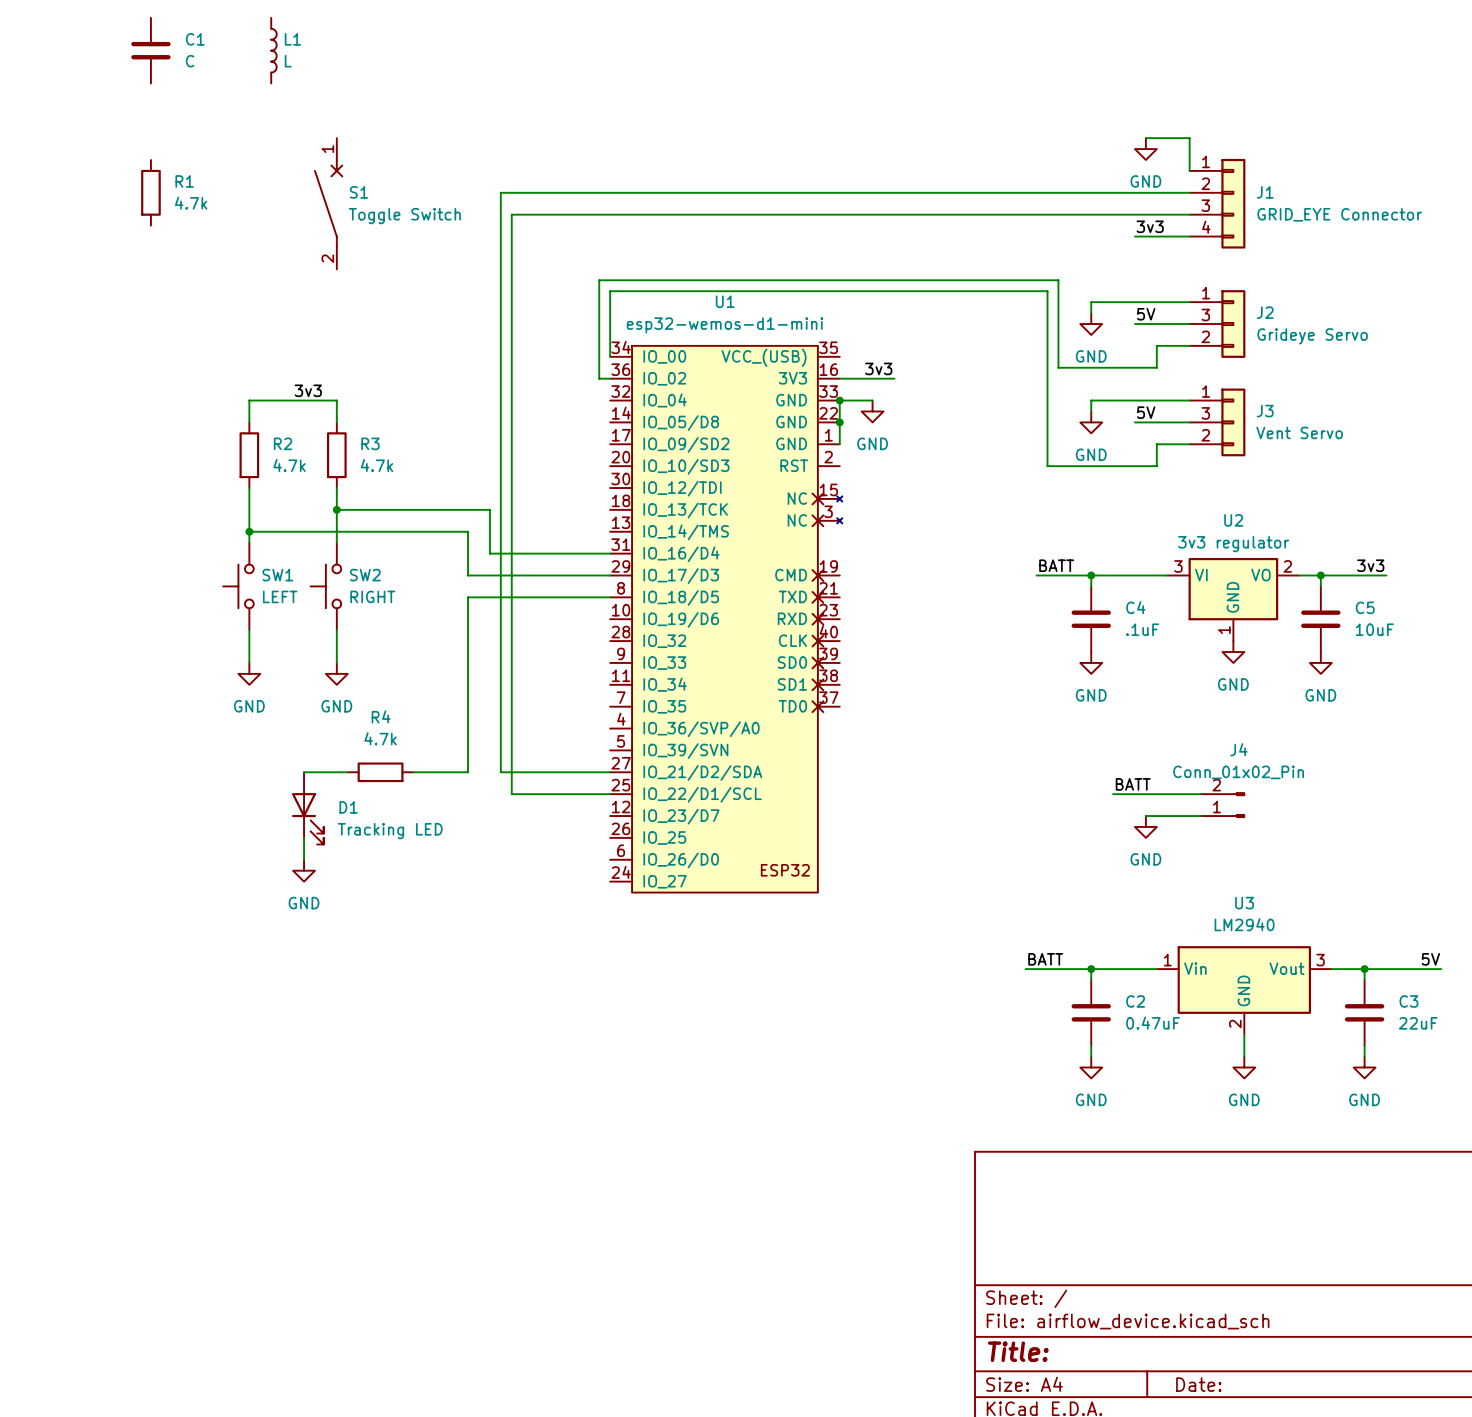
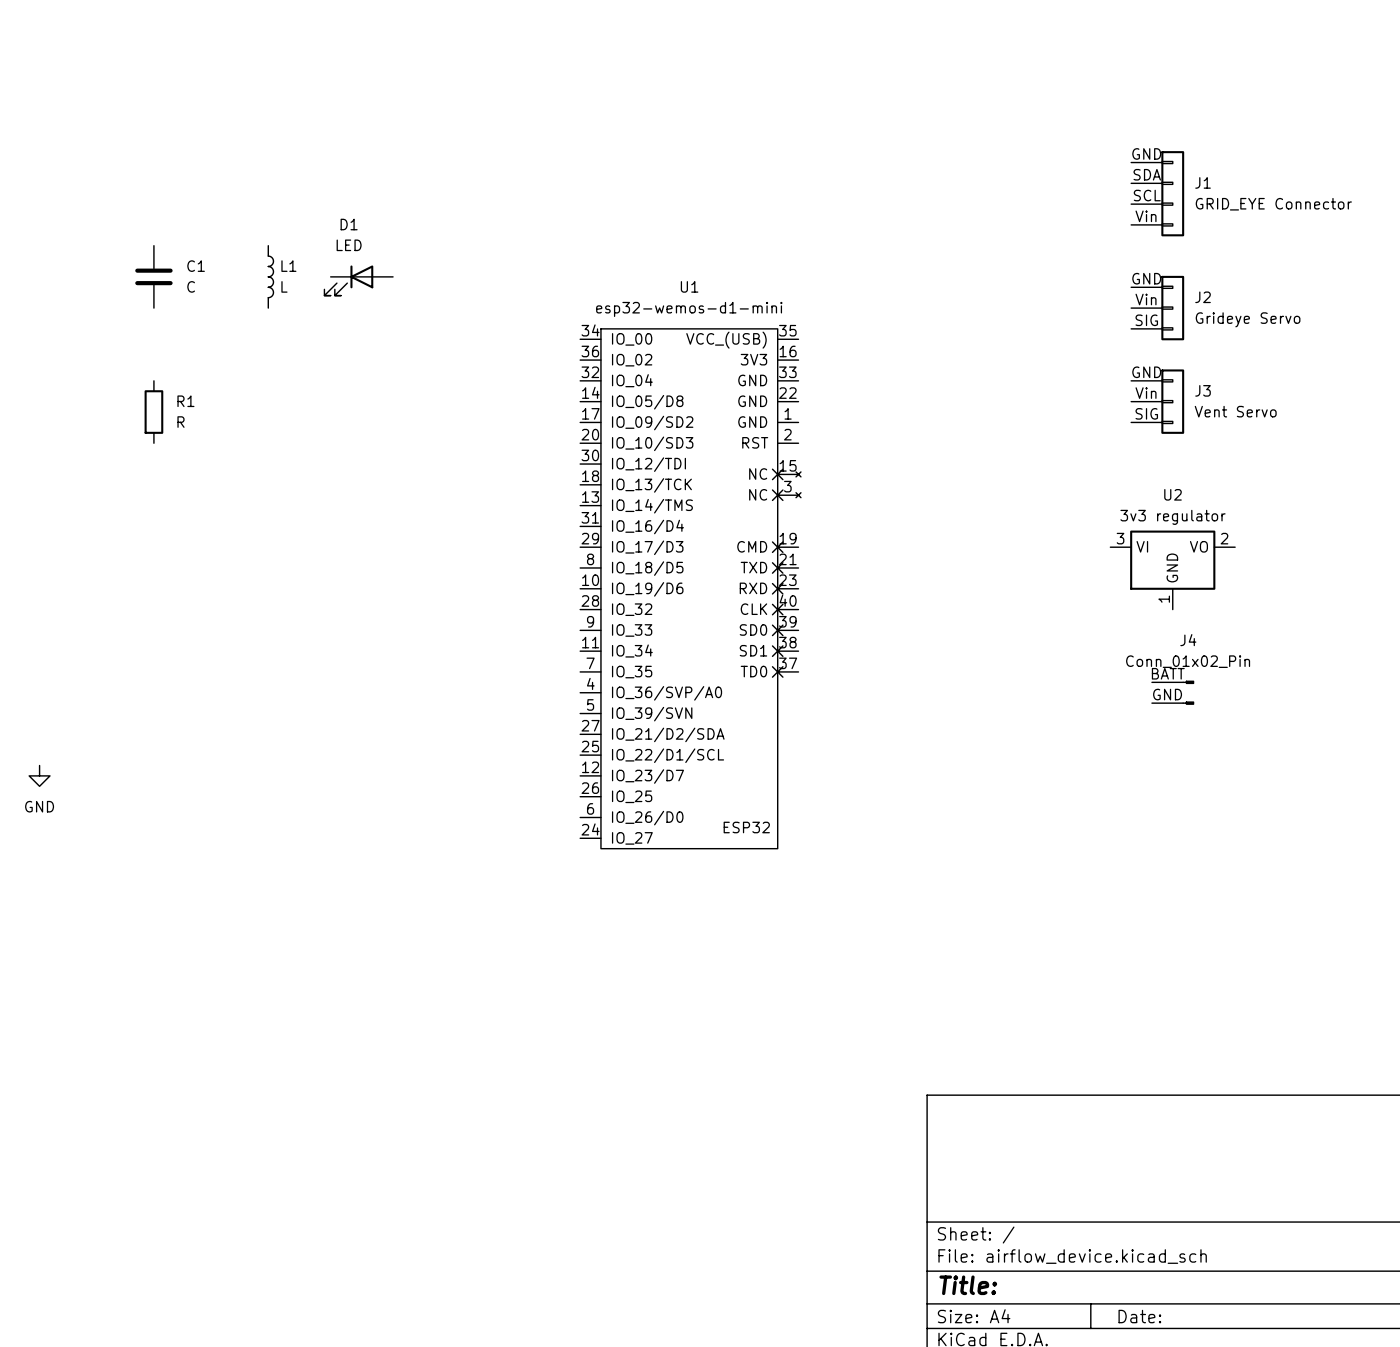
C1 position: (150, 50) -> (153, 276)
L1 position: (273, 50) -> (270, 276)
wire: (1145, 138) (1189, 138) (1189, 170) -> none
power symbol: GND (1145, 149) -> none
J1 pin number: 1 (1206, 161) -> GND (1146, 153)
J1 pin number: 2 (1205, 183) -> SDA (1147, 174)
R1 position: (150, 192) -> (153, 412)
wire: (1189, 192) (500, 192) (500, 772) (610, 772) -> none
R1 value: 4.7k (191, 203) -> R (180, 422)
S1: Toggle Switch (328, 203) -> none
J1 pin number: 3 (1205, 205) -> SCL (1147, 195)
wire: (1189, 214) (511, 214) (511, 794) (610, 794) -> none
label: 3v3 (1150, 226) -> none
J1 pin number: 4 (1206, 227) -> Vin (1146, 216)
wire: (1134, 236) (1189, 236) -> none
J2 pin number: 1 (1206, 293) -> GND (1146, 278)
wire: (1189, 302) (1091, 302) (1091, 313) -> none
label: 5V (1146, 314) -> none
J2 pin number: 3 (1205, 314) -> Vin (1146, 299)
power symbol: GND (1091, 324) -> none
wire: (1134, 324) (1189, 324) -> none
J2 pin number: 2 (1205, 336) -> SIG (1146, 320)
wire: (1189, 345) (1156, 345) (1156, 367) (1058, 367) (1058, 280) (599, 280) (599, 378) (610, 378) -> none
wire: (610, 356) (610, 291) (1047, 291) (1047, 466) (1156, 466) (1156, 444) (1189, 444) -> none
label: 3v3 (878, 368) -> none
wire: (839, 378) (894, 378) -> none
label: 3v3 (308, 390) -> none
J3 pin number: 1 (1206, 391) -> GND (1146, 372)
junction: (839, 400) -> none
wire: (872, 400) (839, 400) (839, 444) -> none
wire: (1189, 400) (1091, 400) (1091, 411) -> none
power symbol: GND (872, 411) -> none
label: 5V (1146, 412) -> none
J3 pin number: 3 (1205, 413) -> Vin (1146, 393)
wire: (249, 422) (249, 400) (336, 400) (336, 422) -> none
junction: (839, 422) -> none
power symbol: GND (1091, 422) -> none
wire: (1134, 422) (1189, 422) -> none
J3 pin number: 2 (1205, 435) -> SIG (1146, 413)
R2: 4.7k (249, 455) -> none
R3: 4.7k (336, 455) -> none
wire: (249, 488) (249, 542) -> none
wire: (336, 488) (336, 542) -> none
wire: (336, 509) (489, 509) (489, 553) (610, 553) -> none
junction: (336, 509) -> none
wire: (249, 531) (468, 531) (468, 575) (610, 575) -> none
junction: (249, 531) -> none
label: BATT (1056, 565) -> none
label: 3v3 (1370, 565) -> none
wire: (1036, 575) (1167, 575) -> none
wire: (1091, 575) (1091, 586) -> none
junction: (1091, 575) -> none
wire: (1298, 575) (1386, 575) -> none
wire: (1320, 575) (1320, 586) -> none
junction: (1320, 575) -> none
SW1: LEFT (238, 586) -> none
SW2: RIGHT (325, 586) -> none
wire: (610, 597) (468, 597) (468, 772) (413, 772) -> none
C4: .1uF (1091, 619) -> none
C5: 10uF (1320, 619) -> none
wire: (249, 630) (249, 662) -> none
wire: (336, 630) (336, 662) -> none
power symbol: GND (1233, 652) -> none
power symbol: GND (1091, 662) -> none
power symbol: GND (1320, 662) -> none
power symbol: GND (249, 673) -> none
power symbol: GND (336, 673) -> none
wire: (304, 772) (347, 772) -> none
R4: 4.7k (380, 772) -> none
label: BATT (1133, 784) -> none
J4 pin number: 2 (1216, 785) -> BATT (1168, 673)
wire: (1113, 794) (1200, 794) -> none
J4 position: (1222, 805) -> (1173, 692)
D1 name position: D1 (348, 807) -> D1 (349, 224)
J4 pin number: 1 (1216, 807) -> GND (1167, 694)
D1 position: (307, 808) -> (358, 280)
power symbol: none -> GND (39, 775)
wire: (1145, 816) (1200, 816) -> none
D1 rotation: 0° (307, 818) -> 90° clockwise (348, 280)
power symbol: GND (1145, 826) -> none
D1 value: Tracking LED (390, 831) -> LED (349, 245)
wire: (304, 837) (304, 859) -> none
power symbol: GND (304, 870) -> none
label: BATT (1045, 959) -> none
label: 5V (1430, 959) -> none
wire: (1025, 969) (1156, 969) -> none
wire: (1091, 969) (1091, 980) -> none
junction: (1091, 969) -> none
wire: (1331, 969) (1441, 969) -> none
wire: (1364, 969) (1364, 980) -> none
junction: (1364, 969) -> none
U3: LM2940 (1244, 990) -> none
C2: 0.47uF (1091, 1012) -> none
C3: 22uF (1364, 1012) -> none
wire: (1244, 1034) (1244, 1056) -> none
wire: (1091, 1045) (1091, 1056) -> none
wire: (1364, 1045) (1364, 1056) -> none
power symbol: GND (1091, 1067) -> none
power symbol: GND (1244, 1067) -> none
power symbol: GND (1364, 1067) -> none

